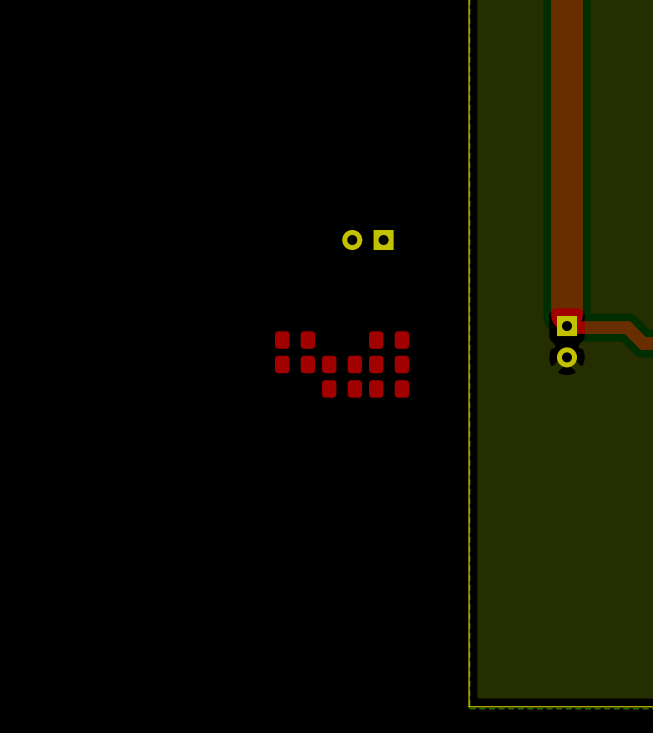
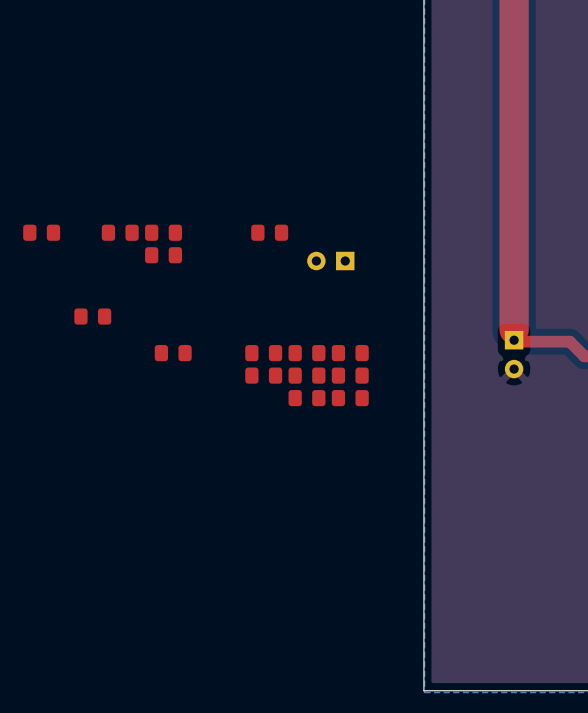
part: none -> (41, 232)
part: none -> (120, 232)
part: none -> (163, 232)
part: none -> (269, 232)
part: none -> (163, 255)
part: none -> (92, 316)
part: none -> (173, 353)
part: none -> (306, 353)

